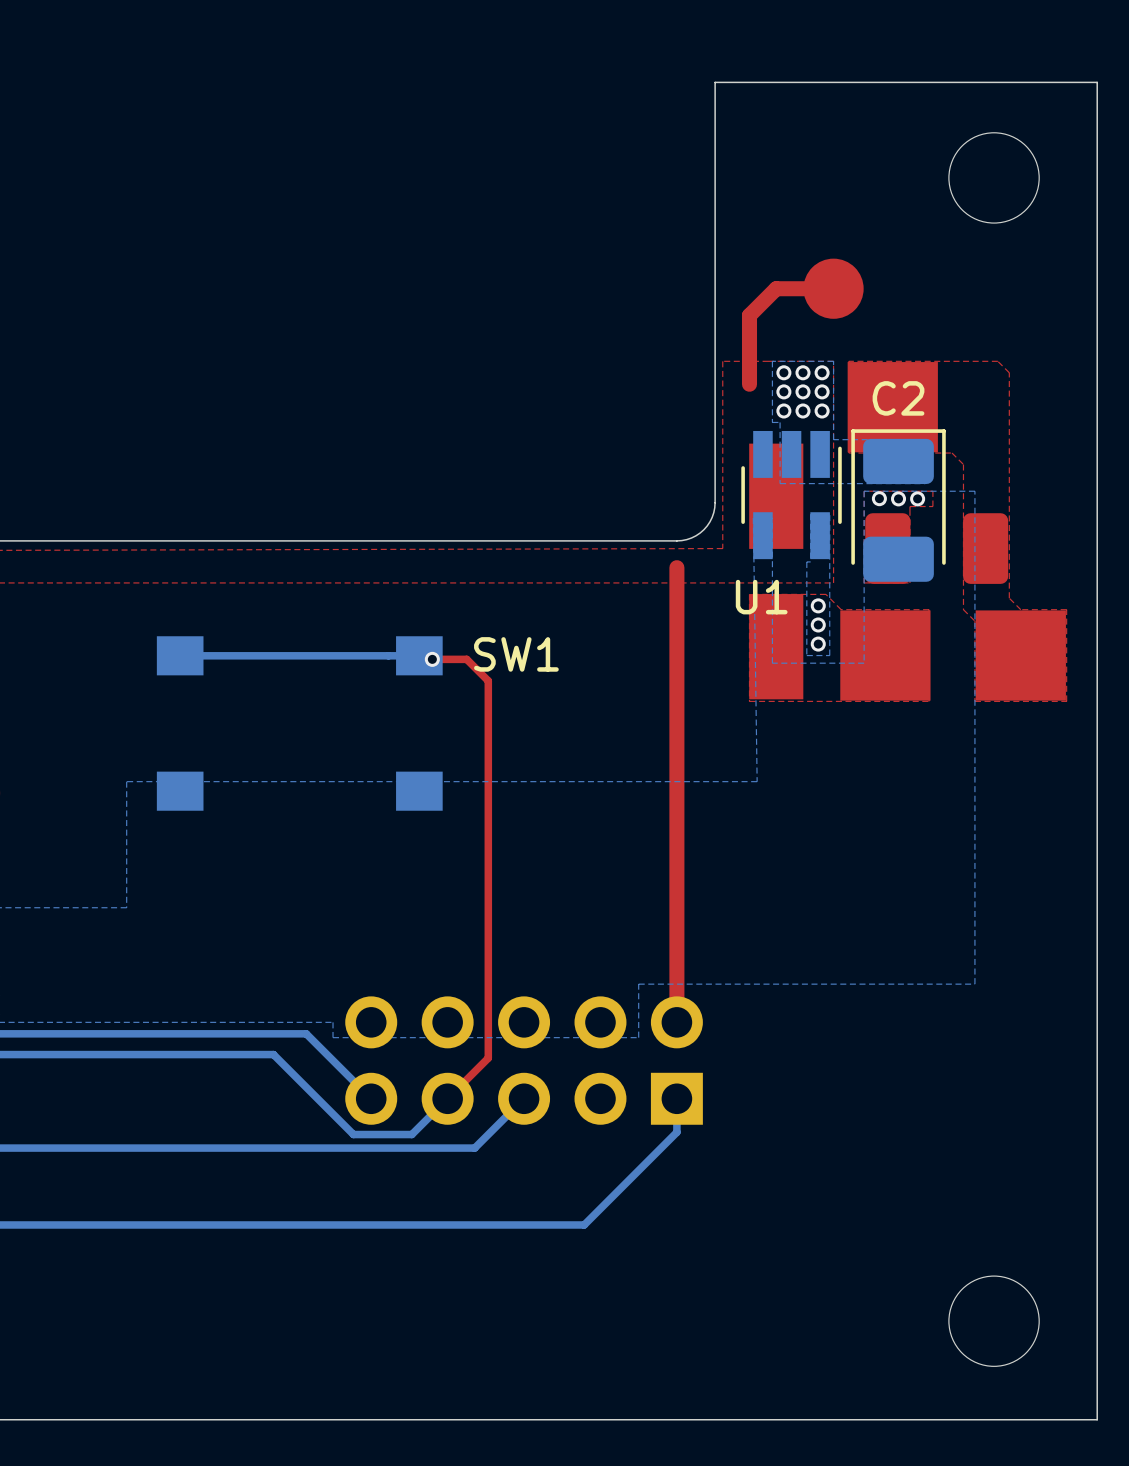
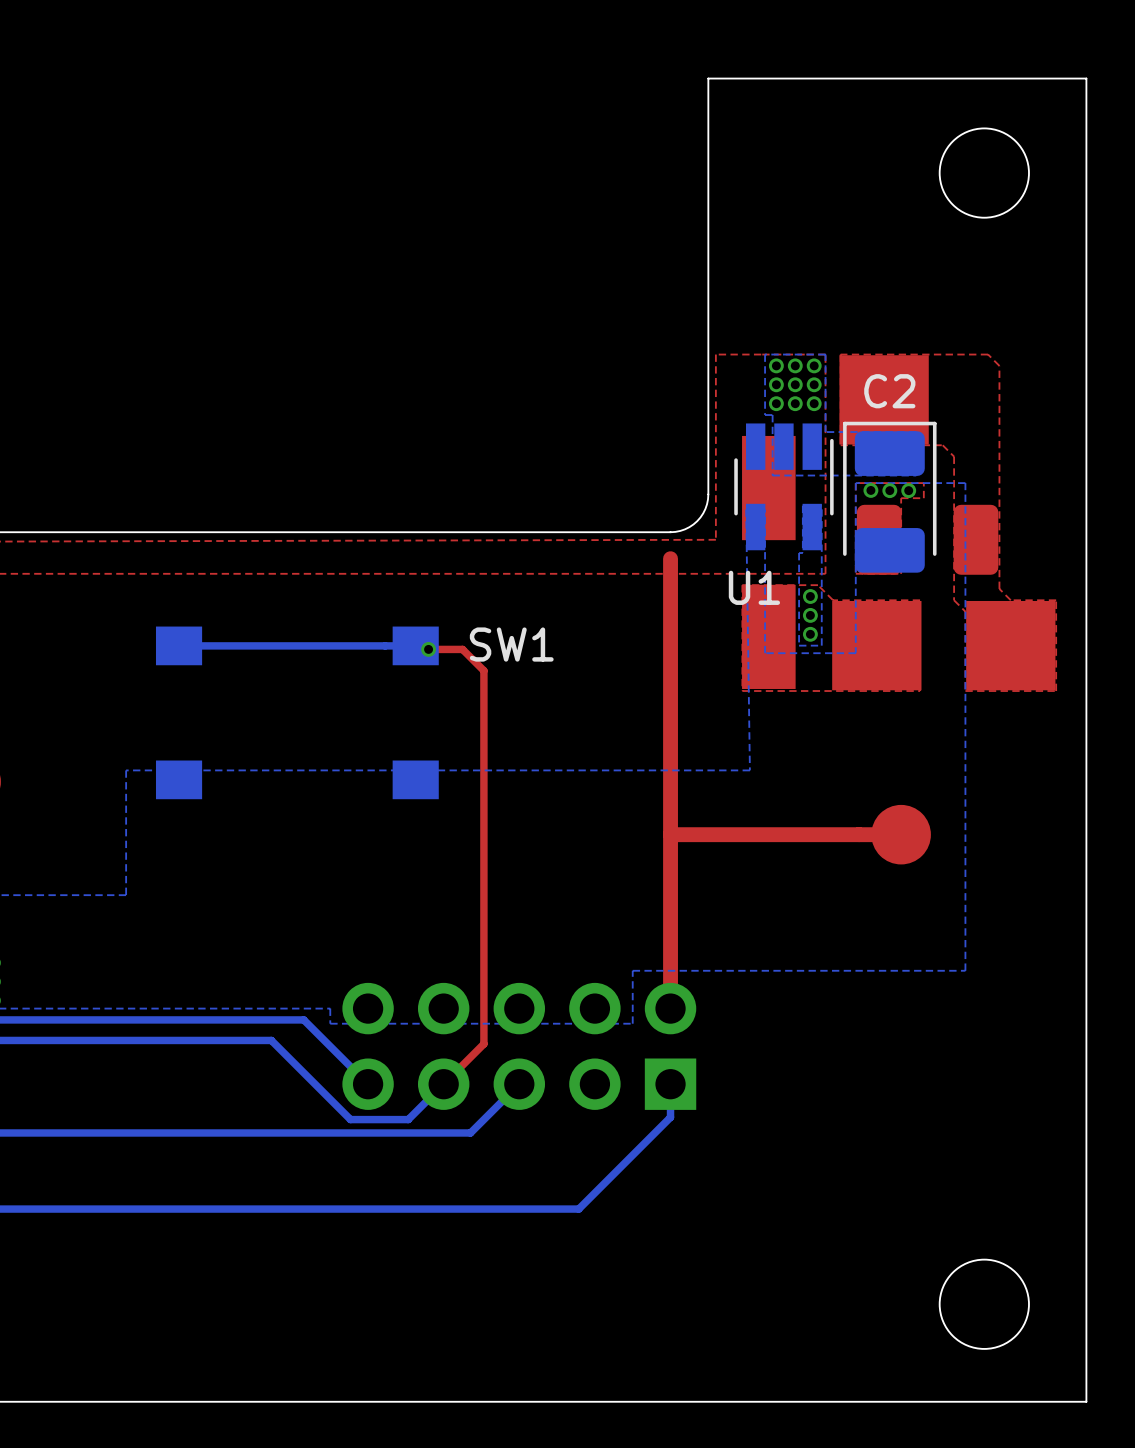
top track: (833, 288) (776, 288) (749, 315) (749, 384) -> none
part position: (833, 288) -> (901, 834)
top track: none -> (901, 834) (670, 834)

